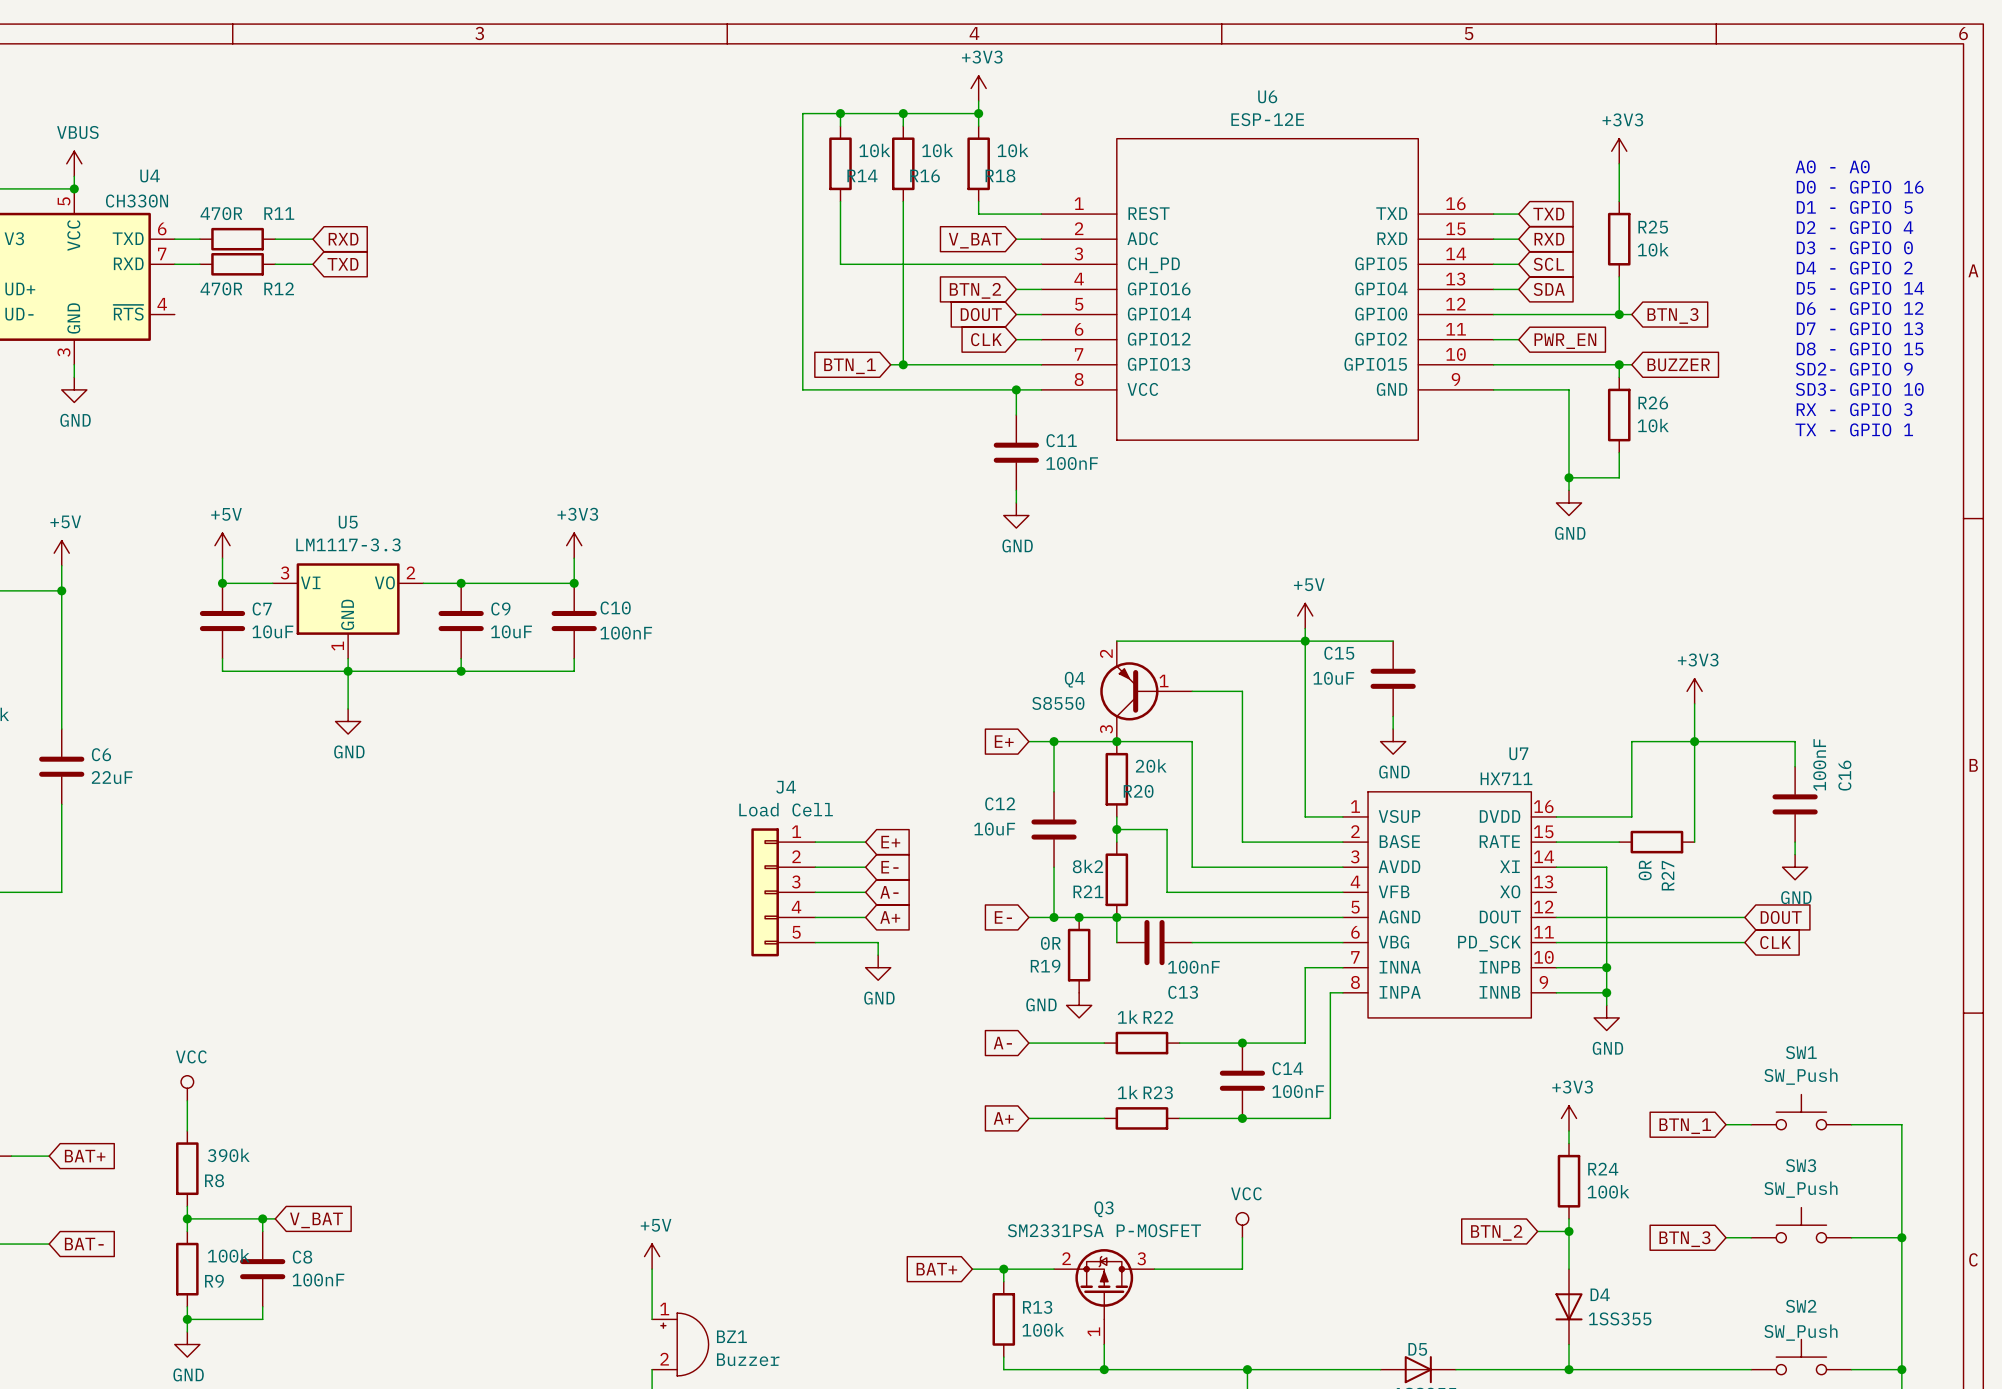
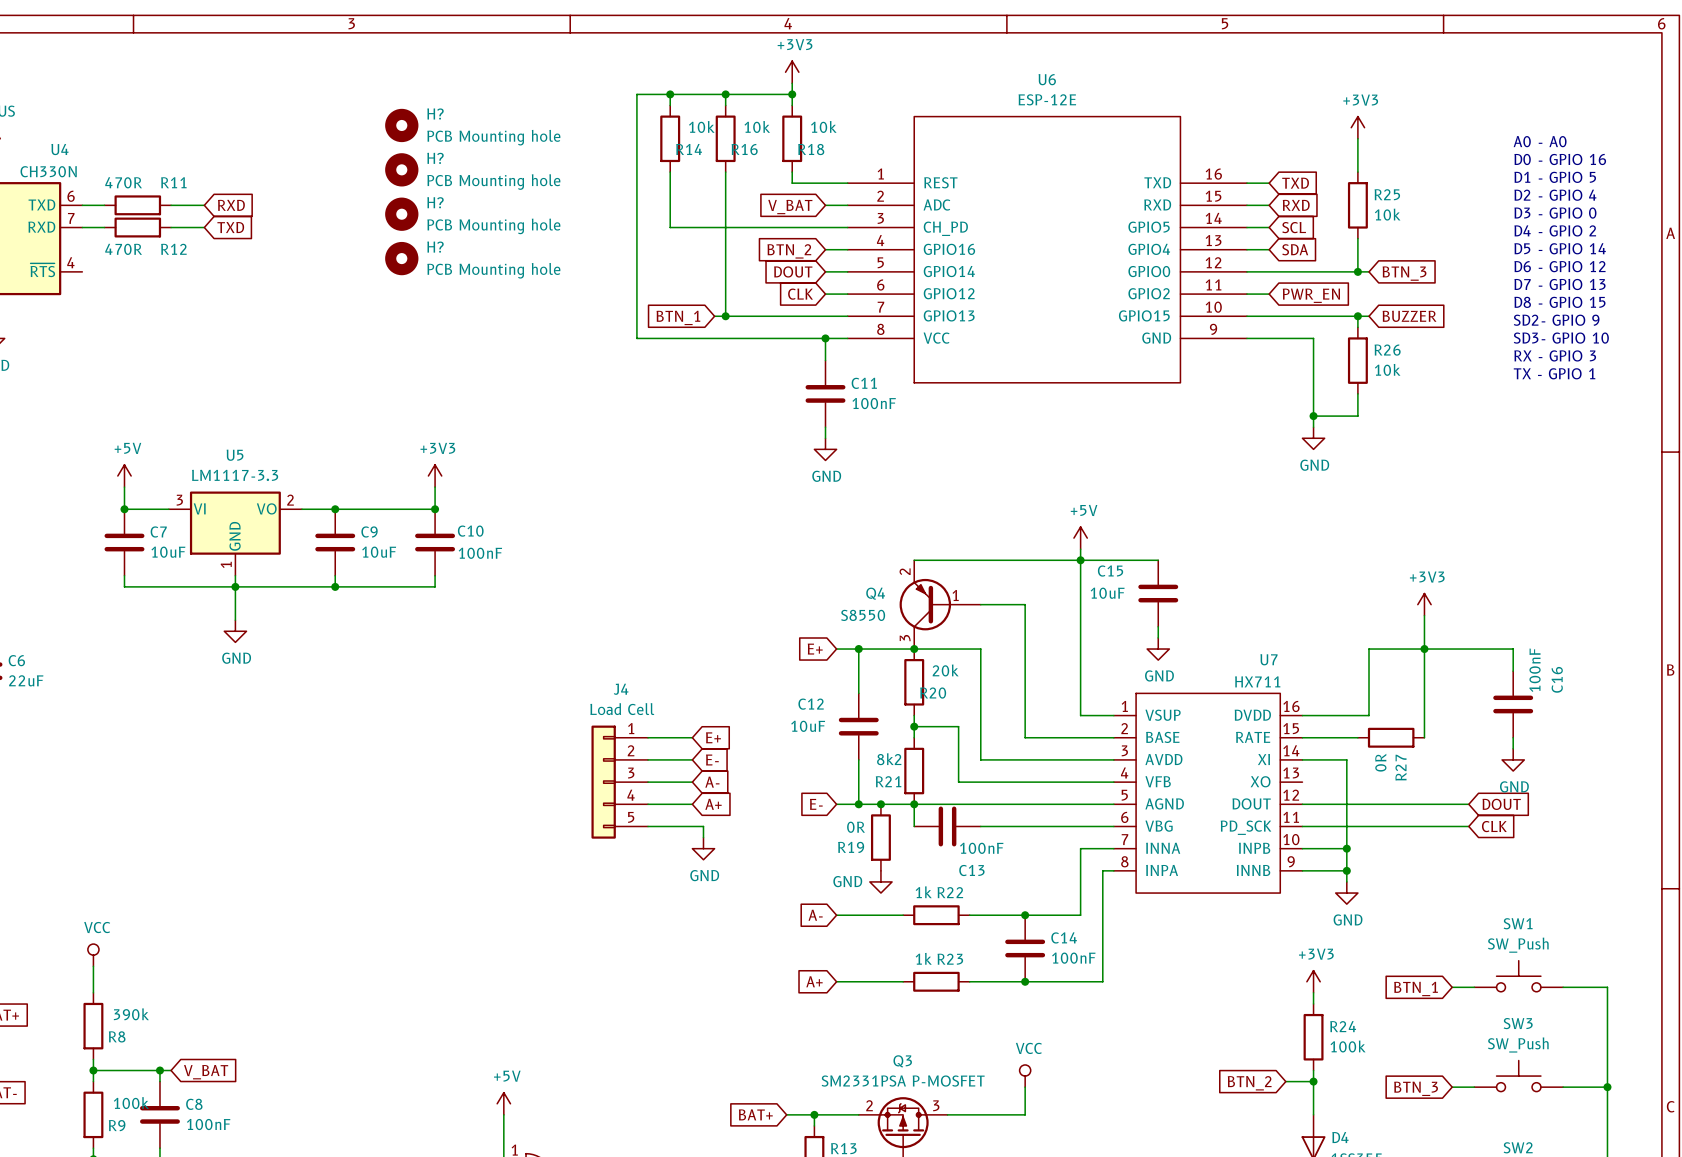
H?: none -> PCB Mounting hole (401, 125)
H?: none -> PCB Mounting hole (401, 169)
H?: none -> PCB Mounting hole (401, 214)
H?: none -> PCB Mounting hole (401, 258)

